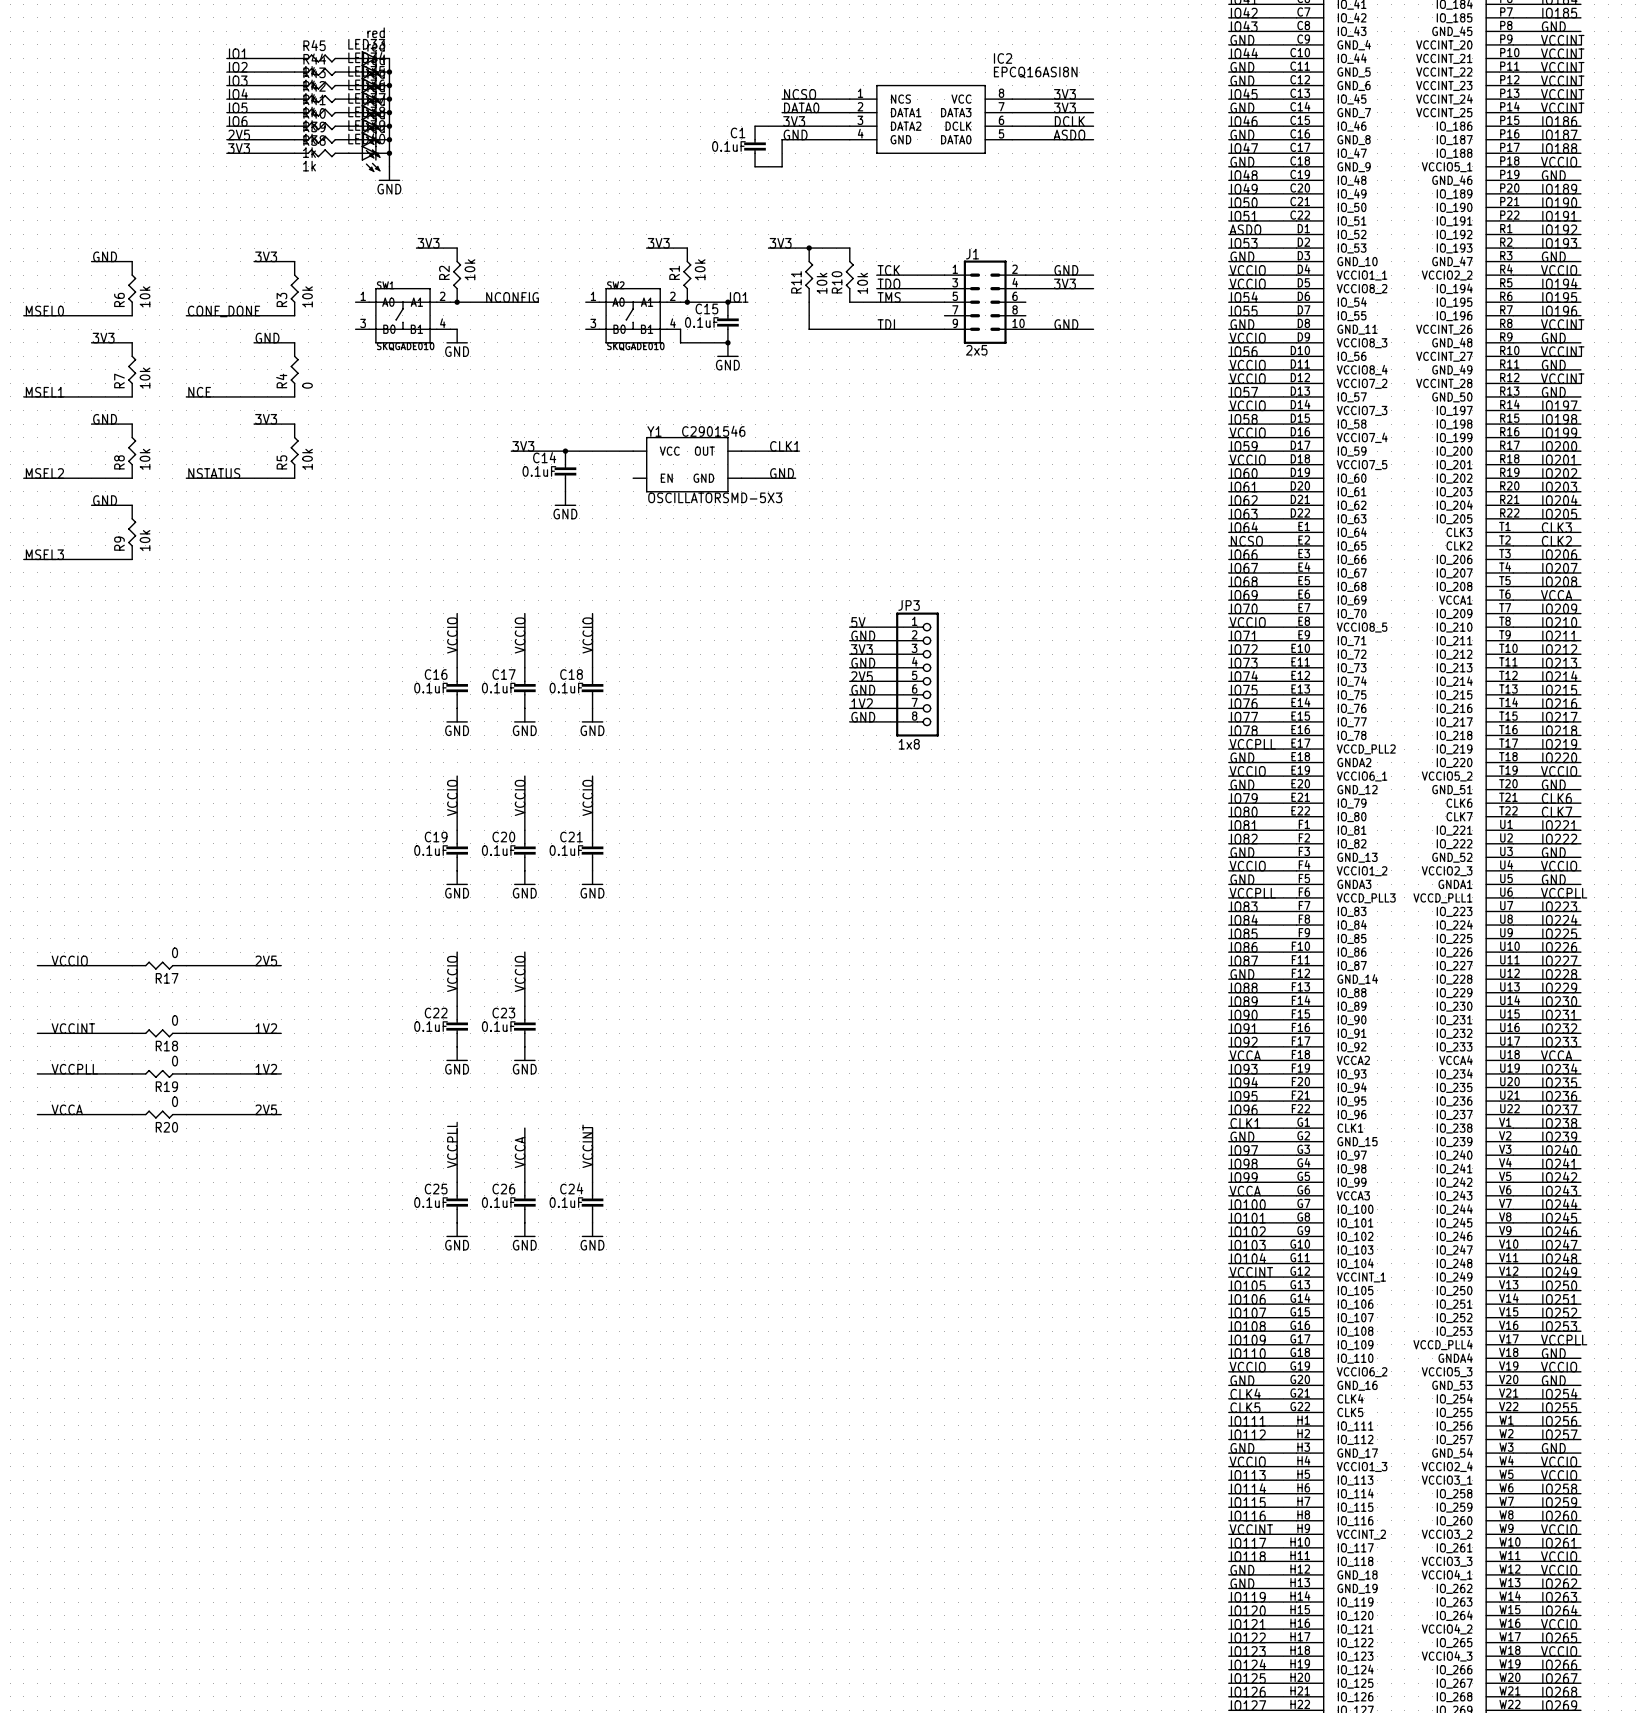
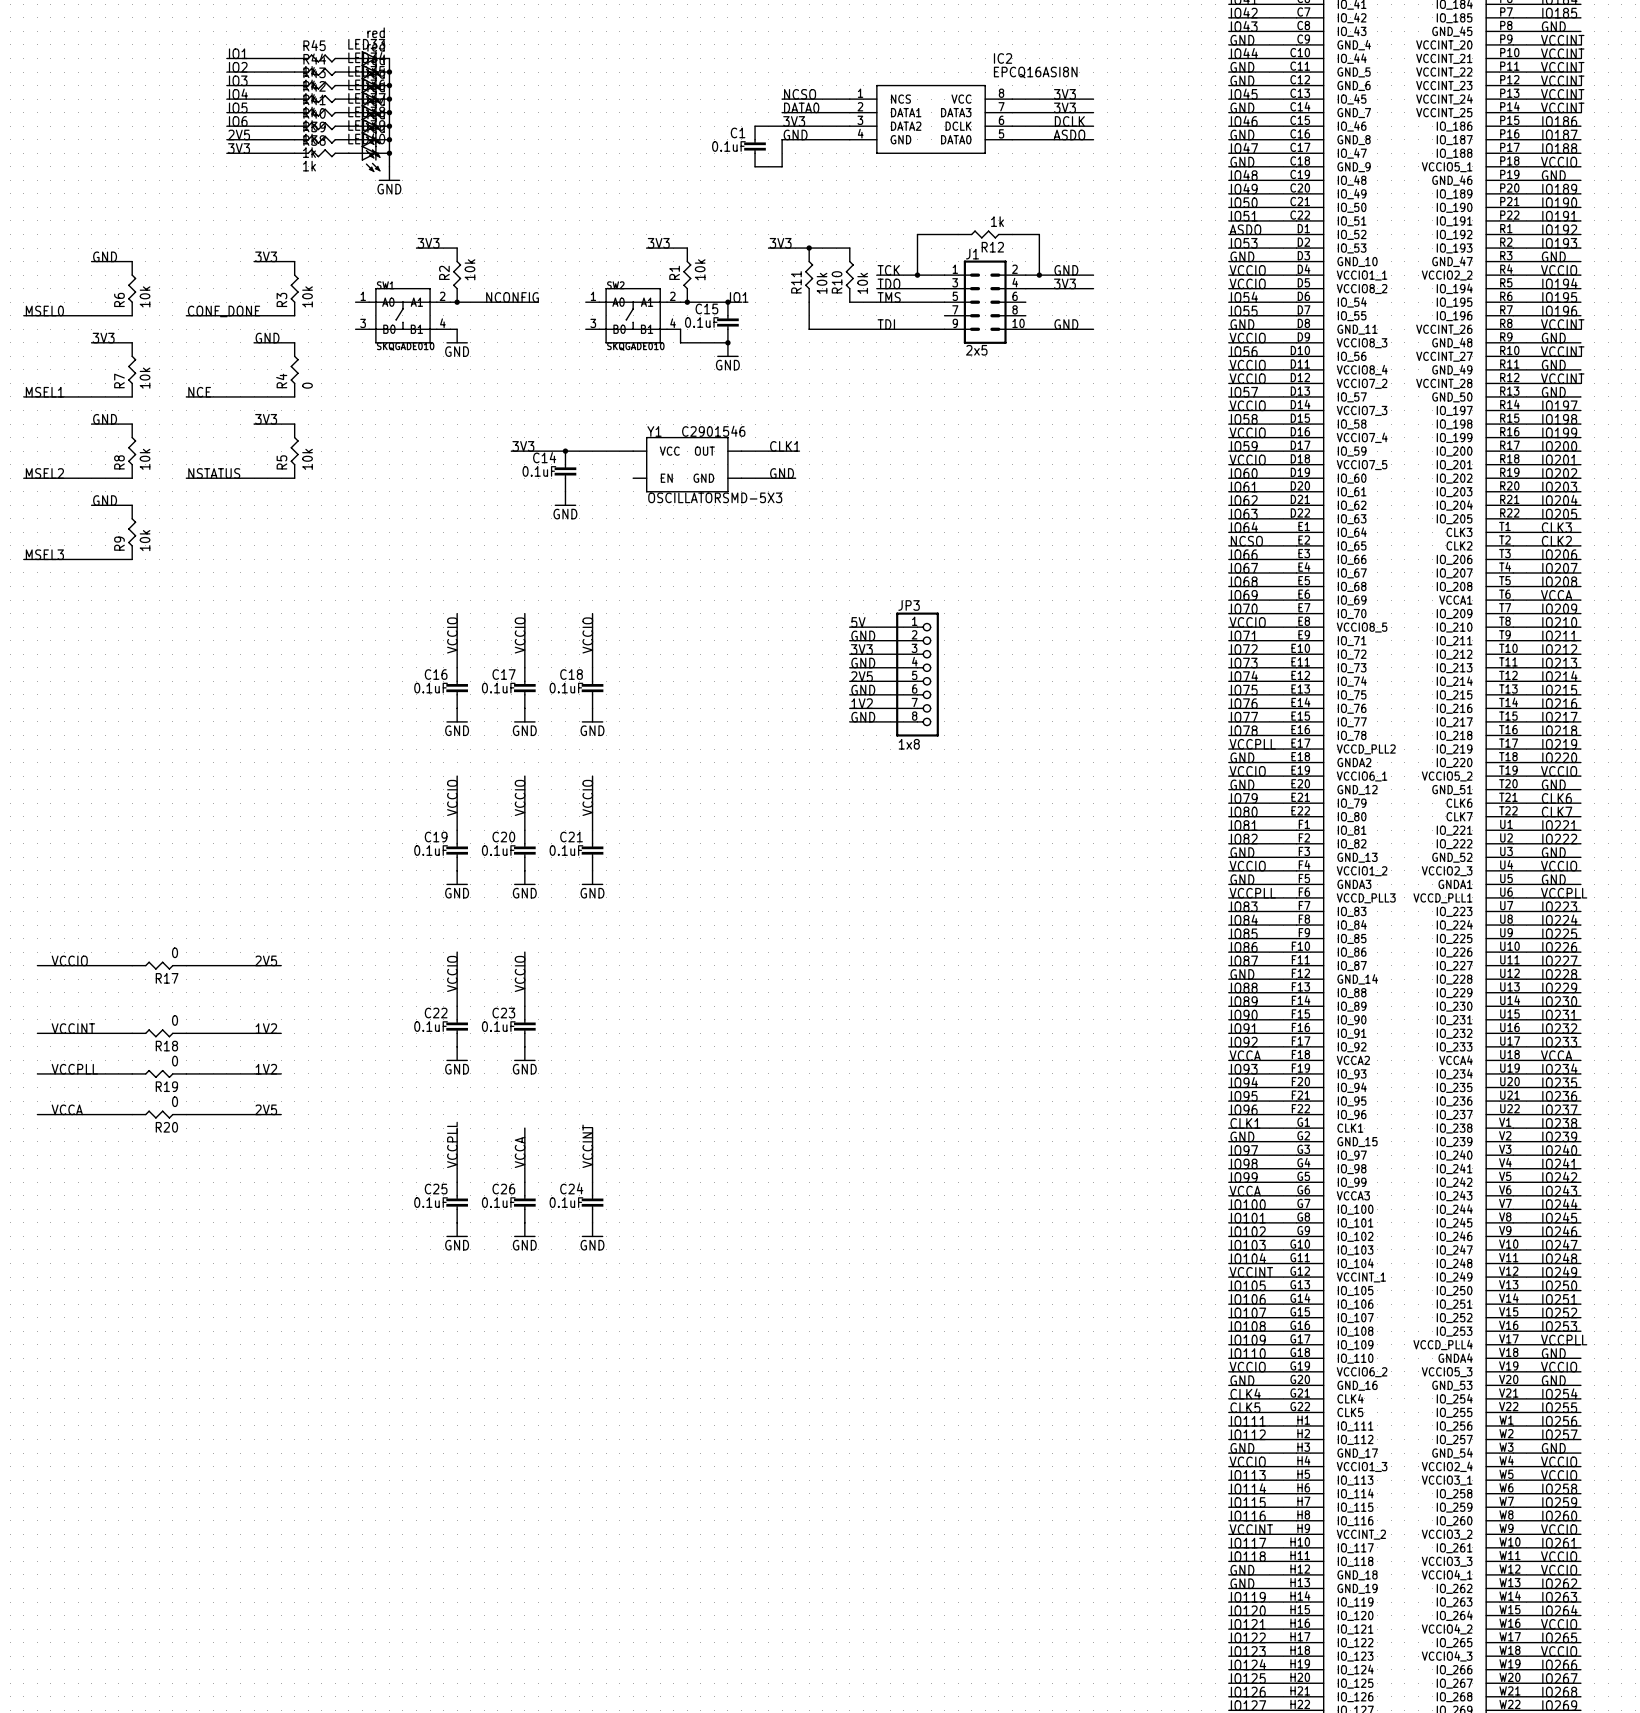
wire: none -> (958, 234) (917, 234) (917, 275)
R12: none -> 1k (985, 234)
wire: none -> (1012, 234) (1039, 234) (1039, 275)
junction: none -> (917, 275)
junction: none -> (1039, 275)

